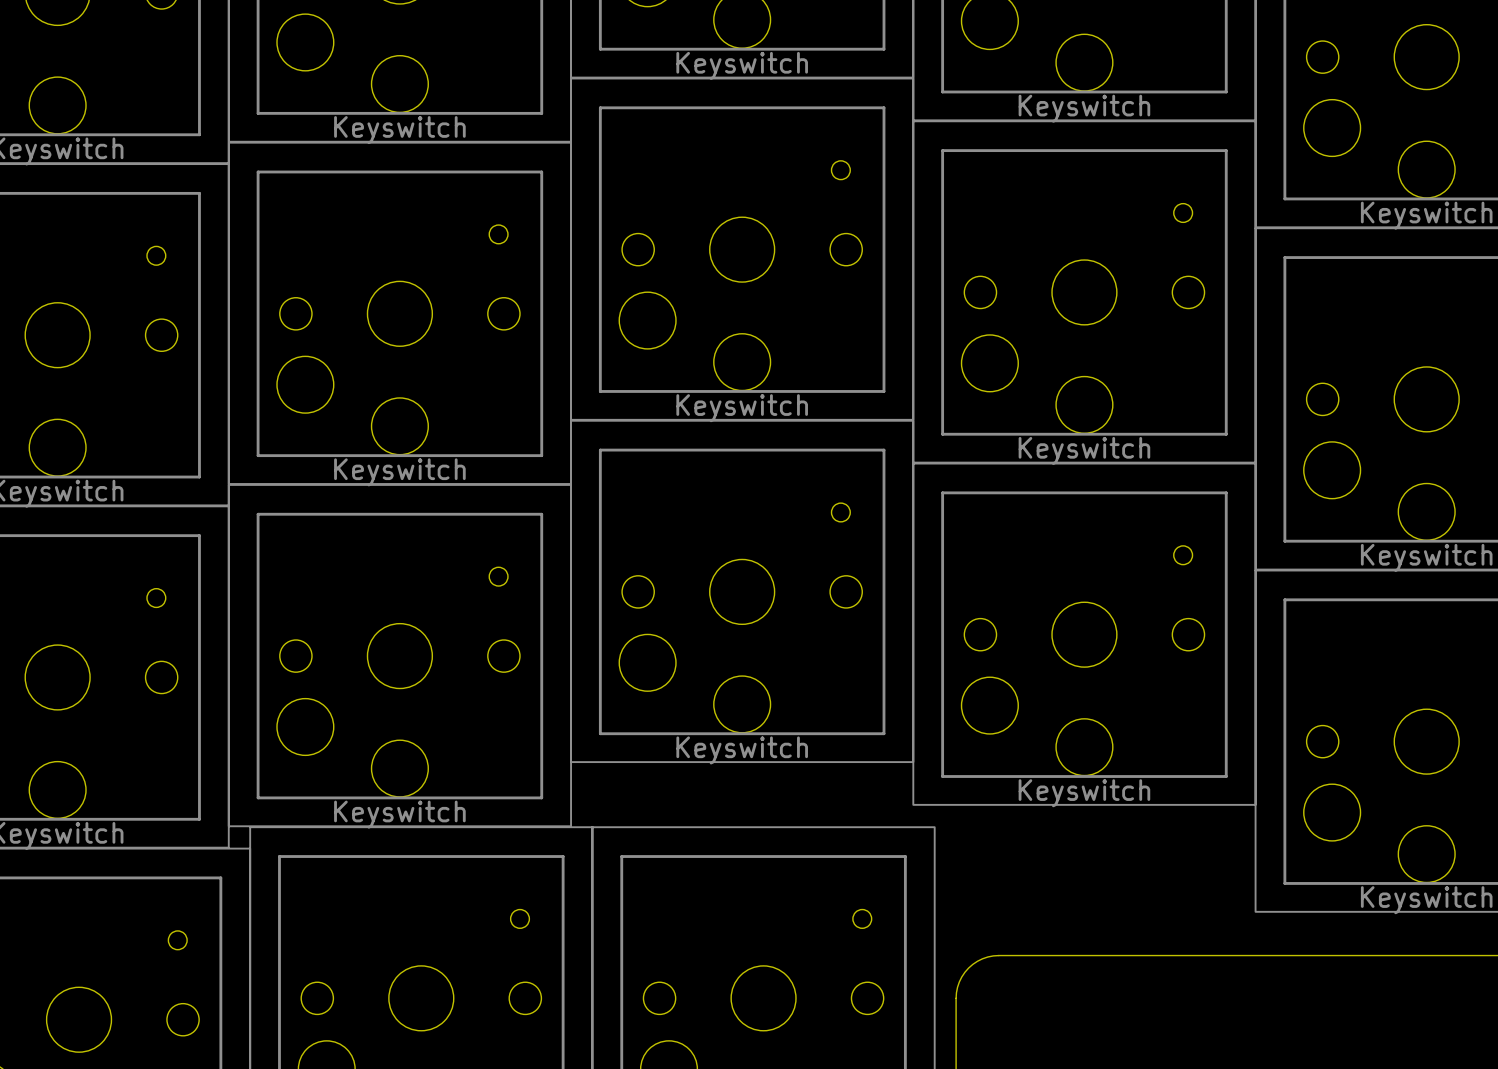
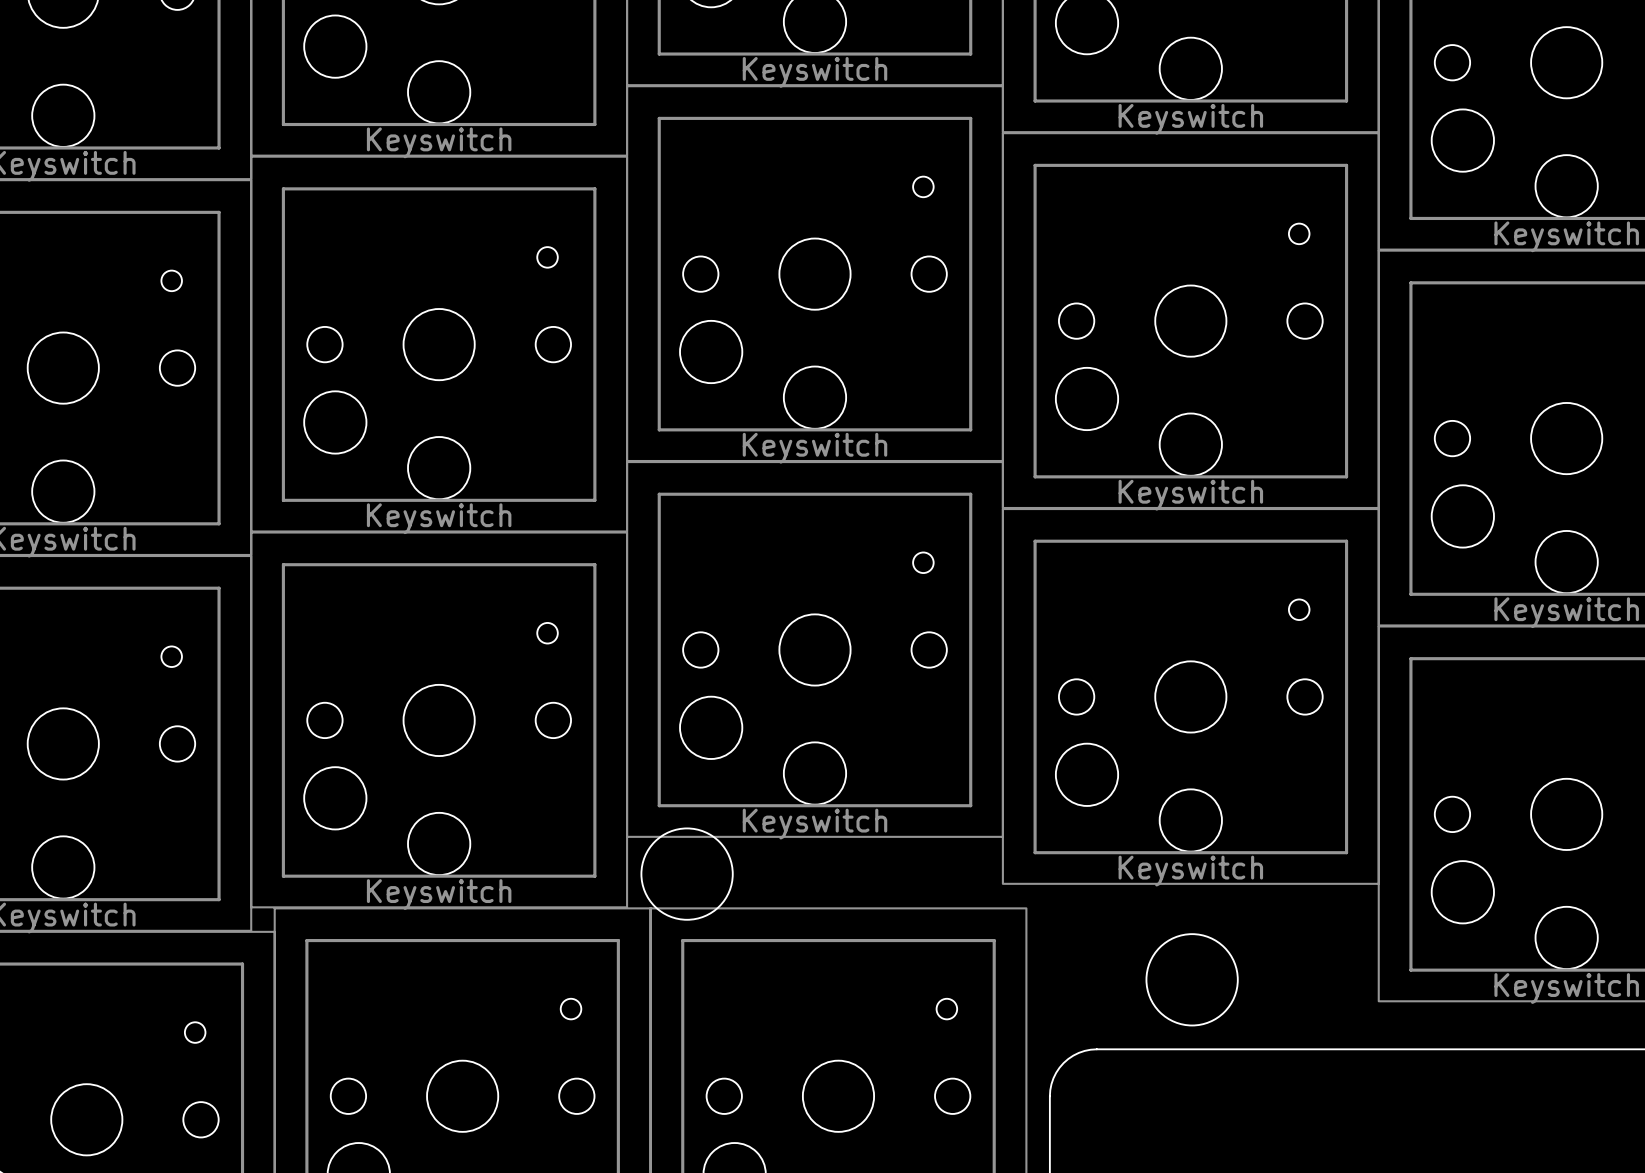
round board edge: none -> [640, 827, 734, 921]
round board edge: none -> [1145, 933, 1239, 1027]

